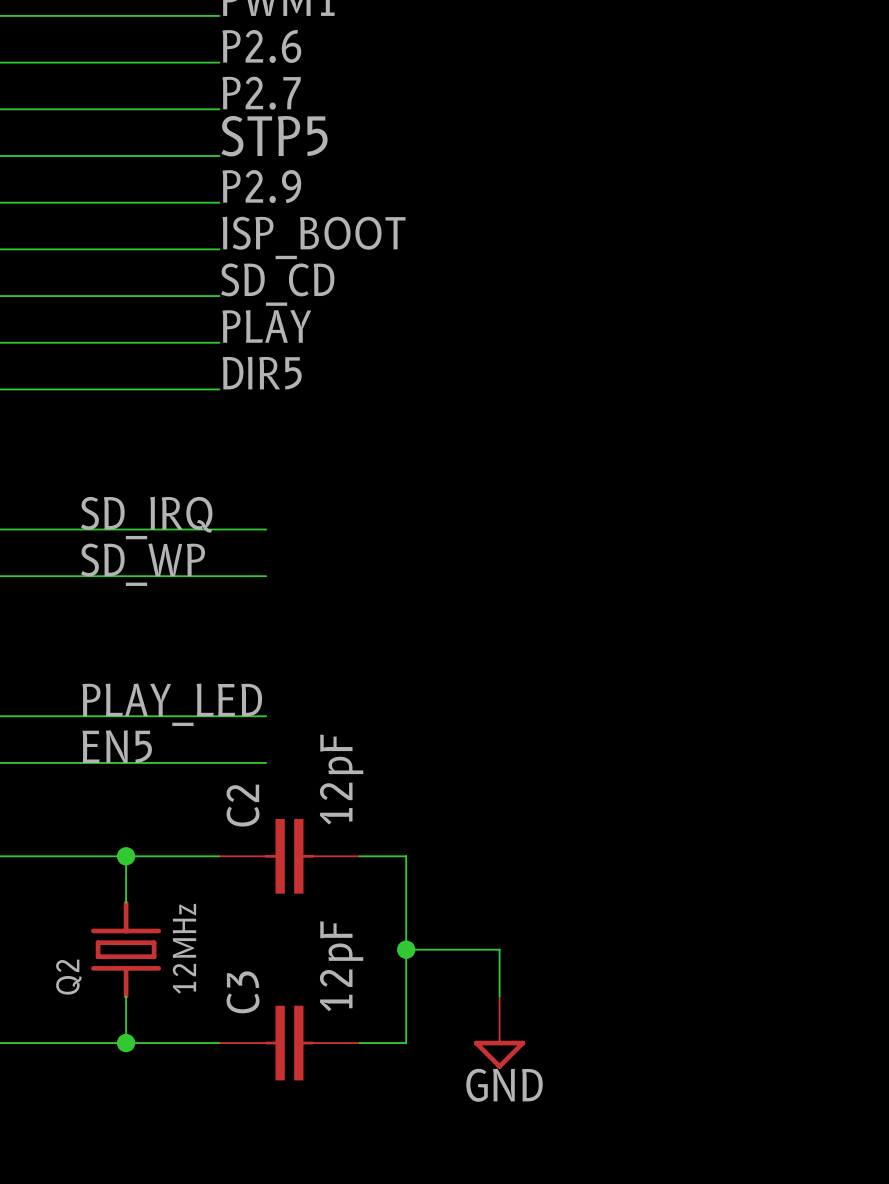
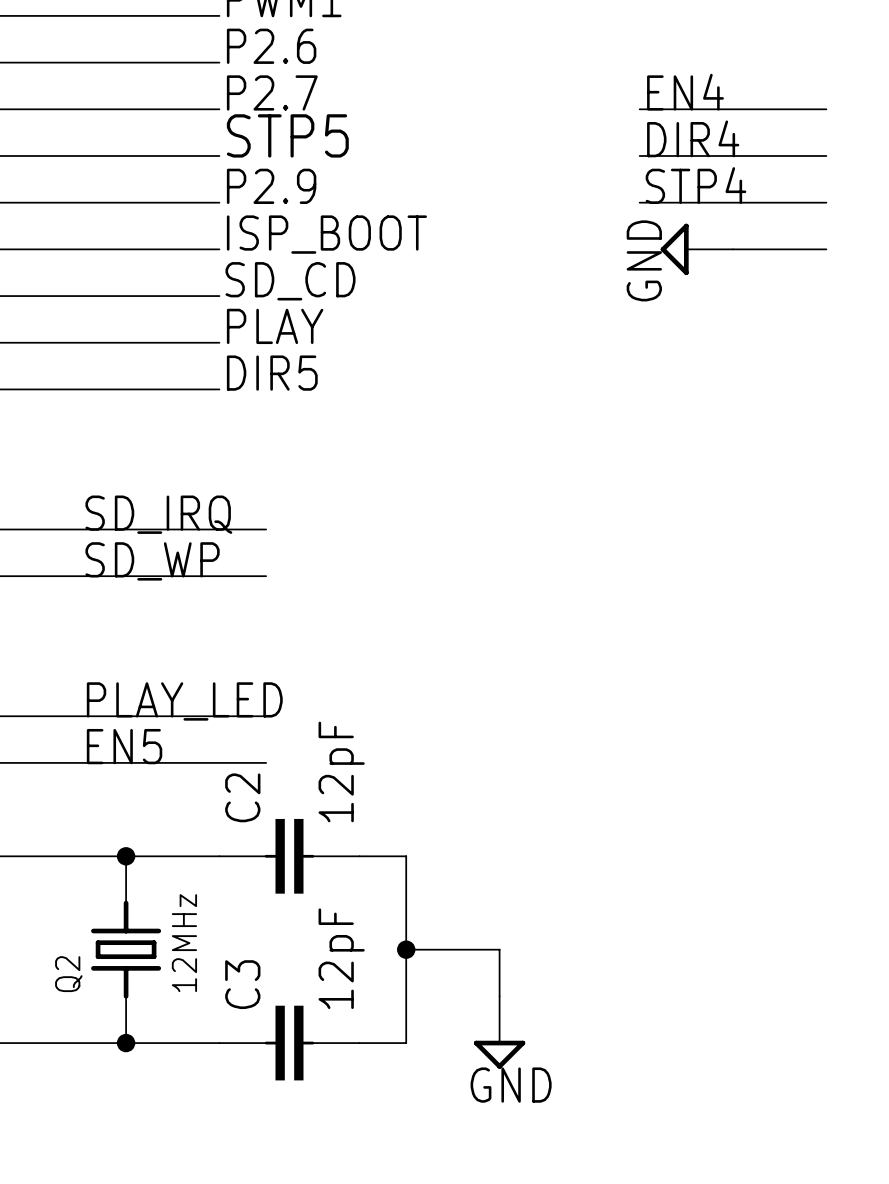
label: none -> EN4 (685, 92)
wire: none -> (639, 109) (826, 109)
label: none -> DIR4 (693, 138)
wire: none -> (639, 155) (826, 155)
label: none -> STP4 (695, 185)
wire: none -> (639, 202) (826, 202)
power symbol: none -> GND (696, 249)
wire: none -> (733, 249) (826, 249)

